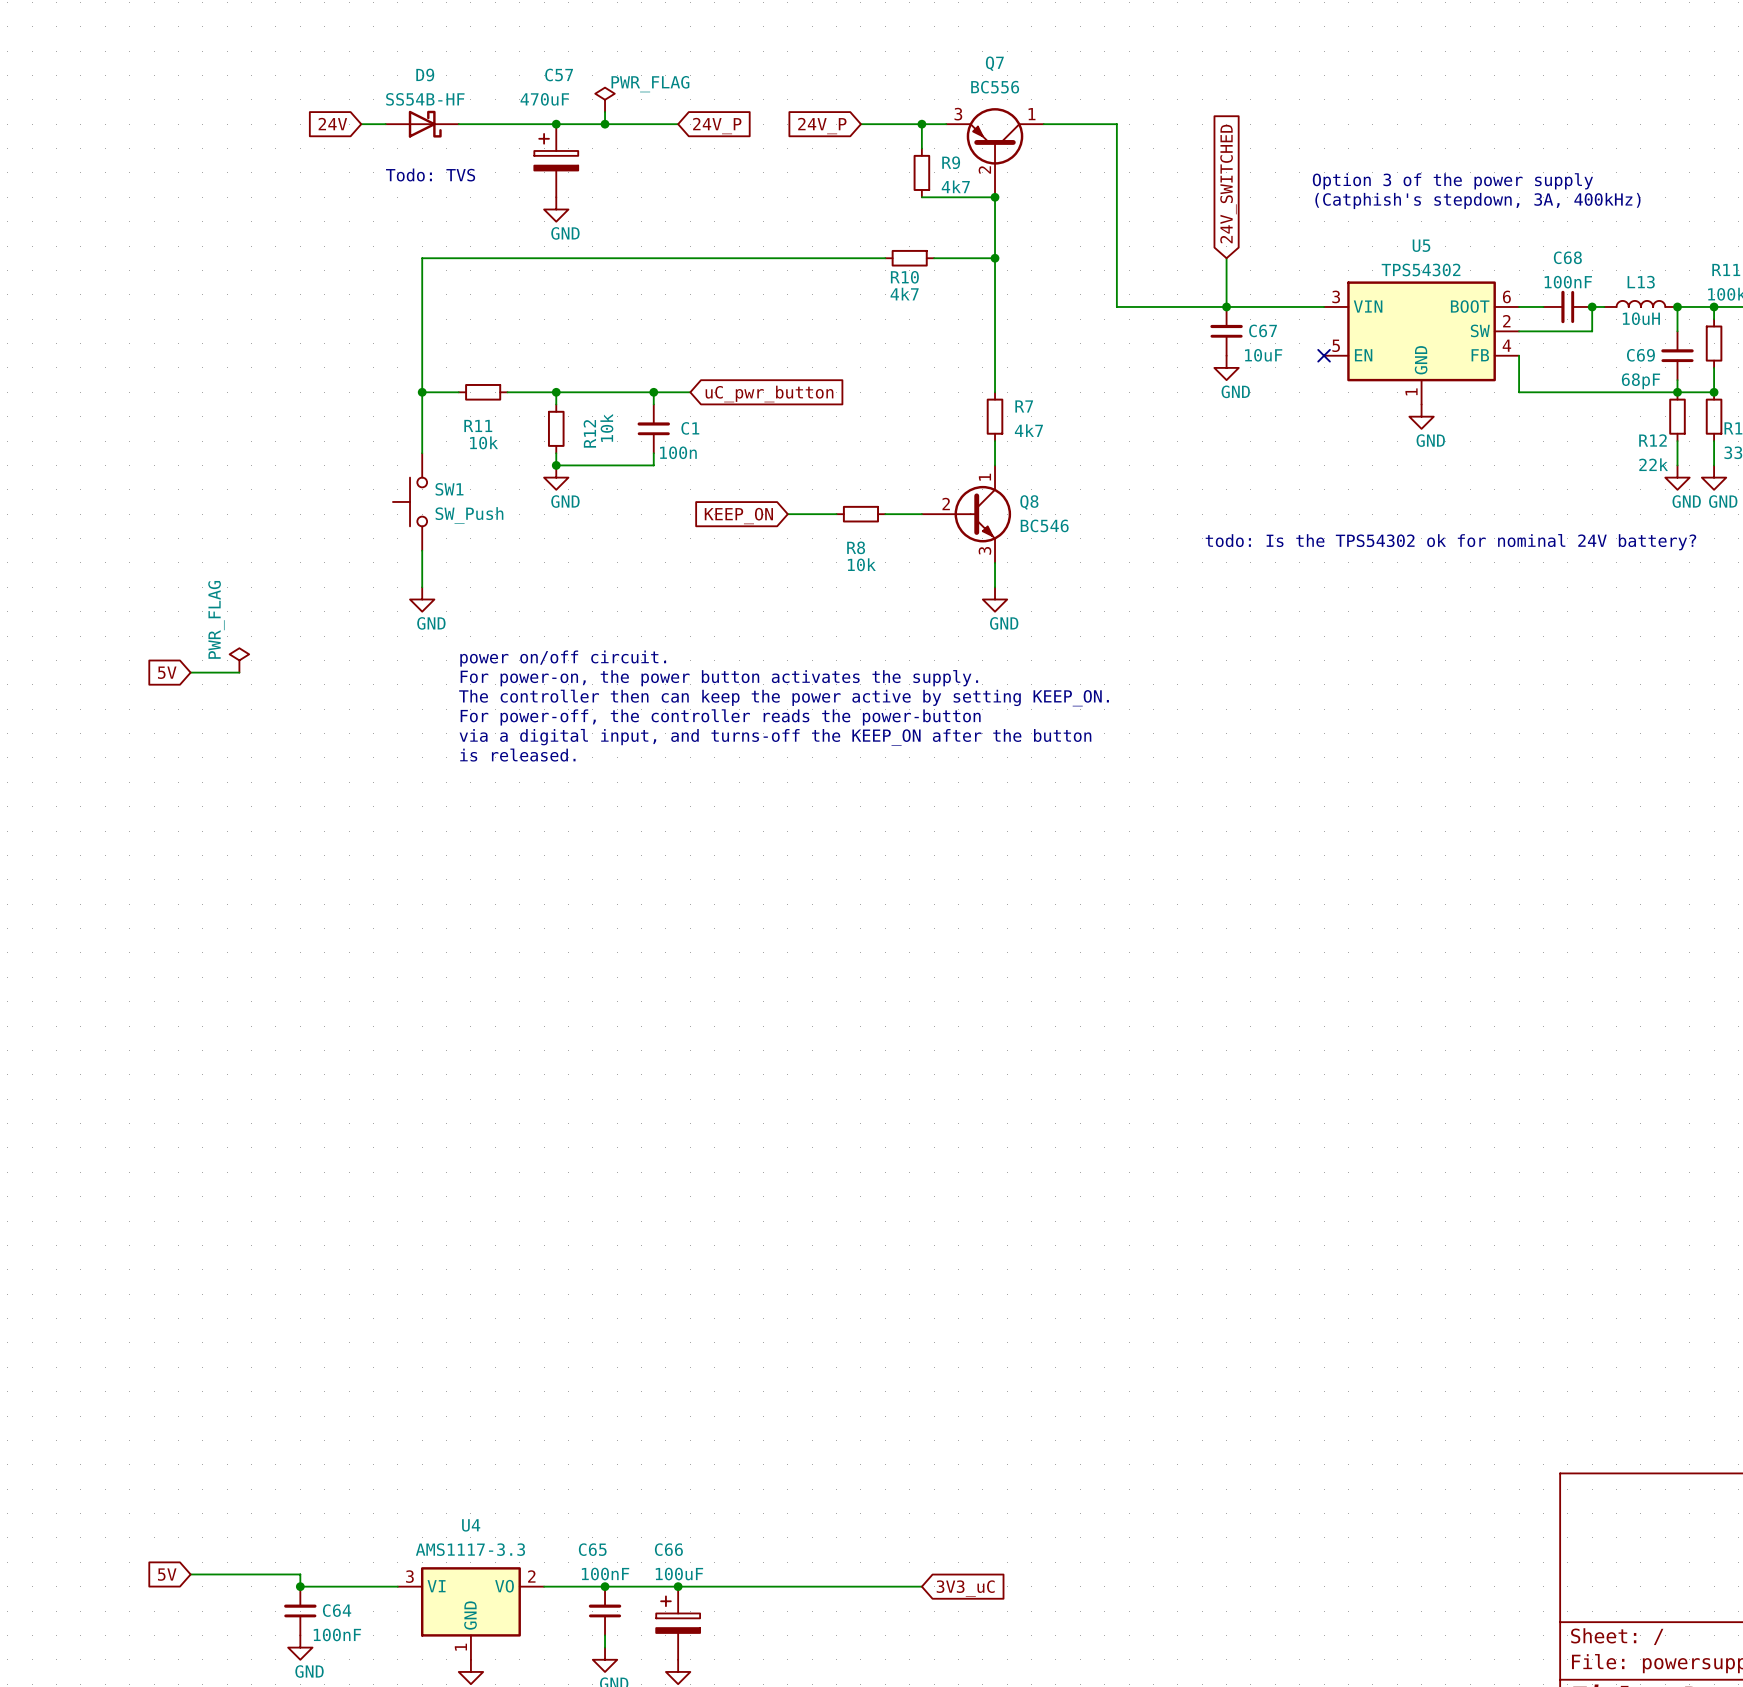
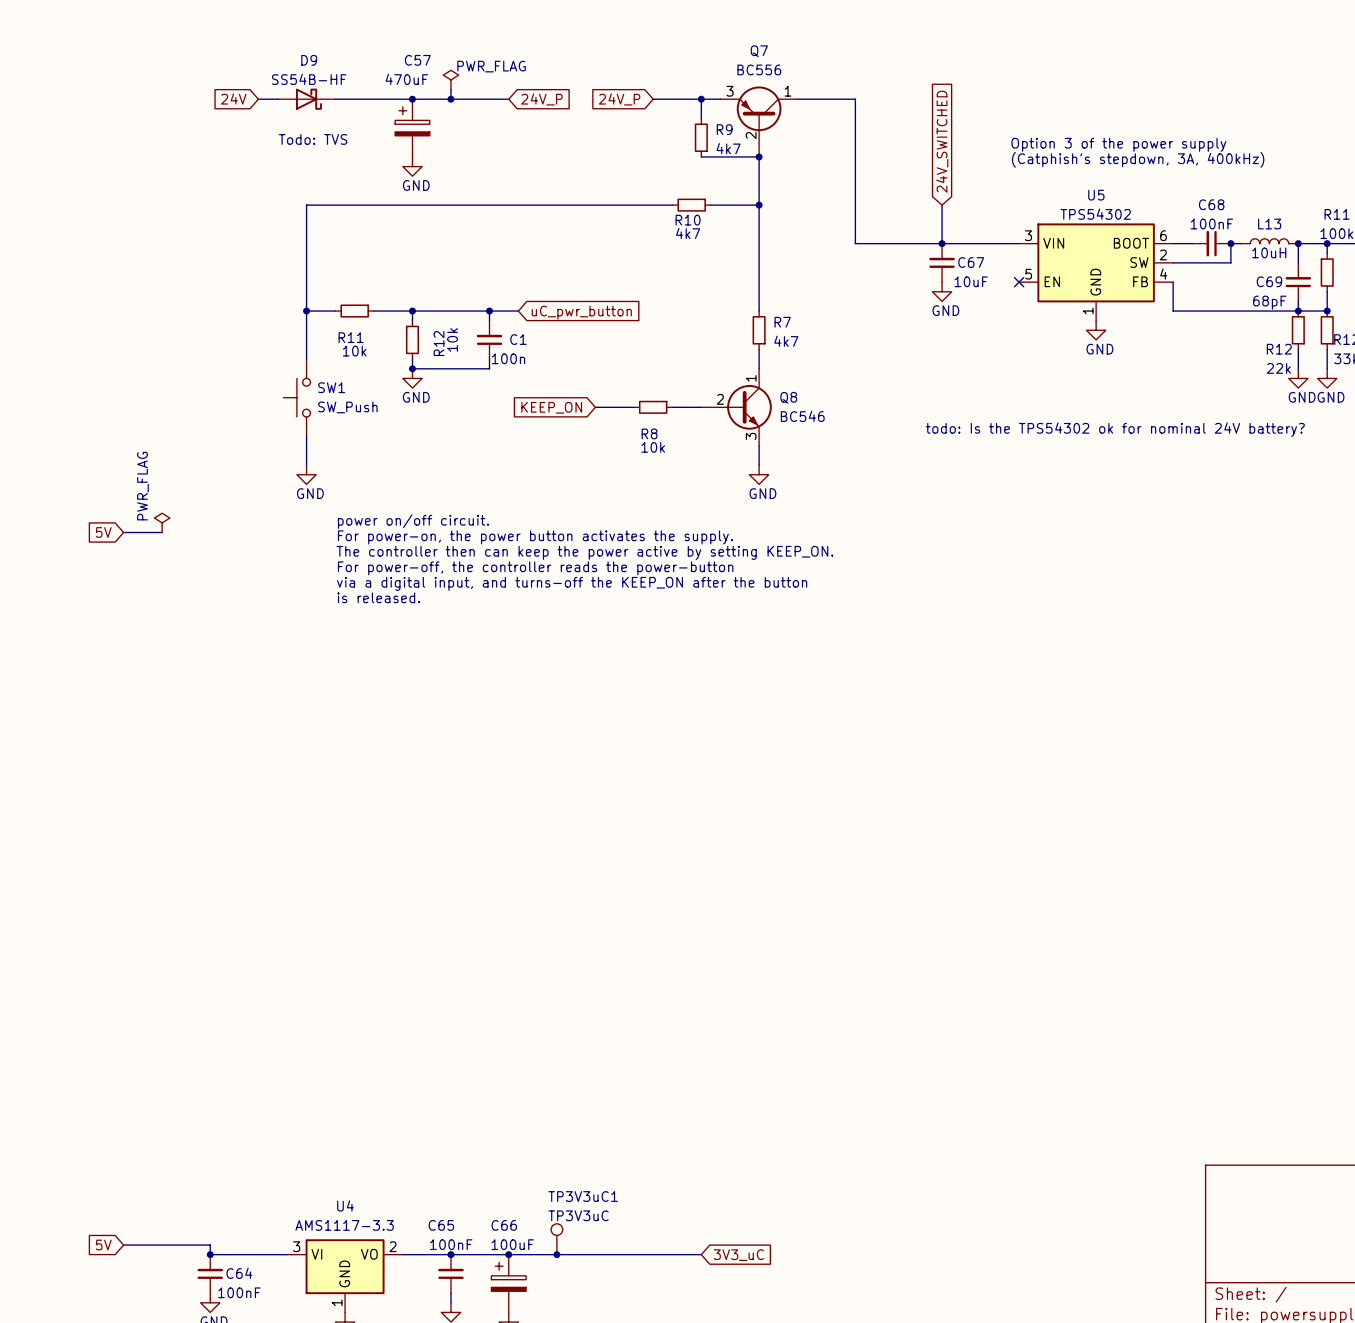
TP3V3uC1: none -> TP3V3uC (556, 1239)
junction: none -> (556, 1254)

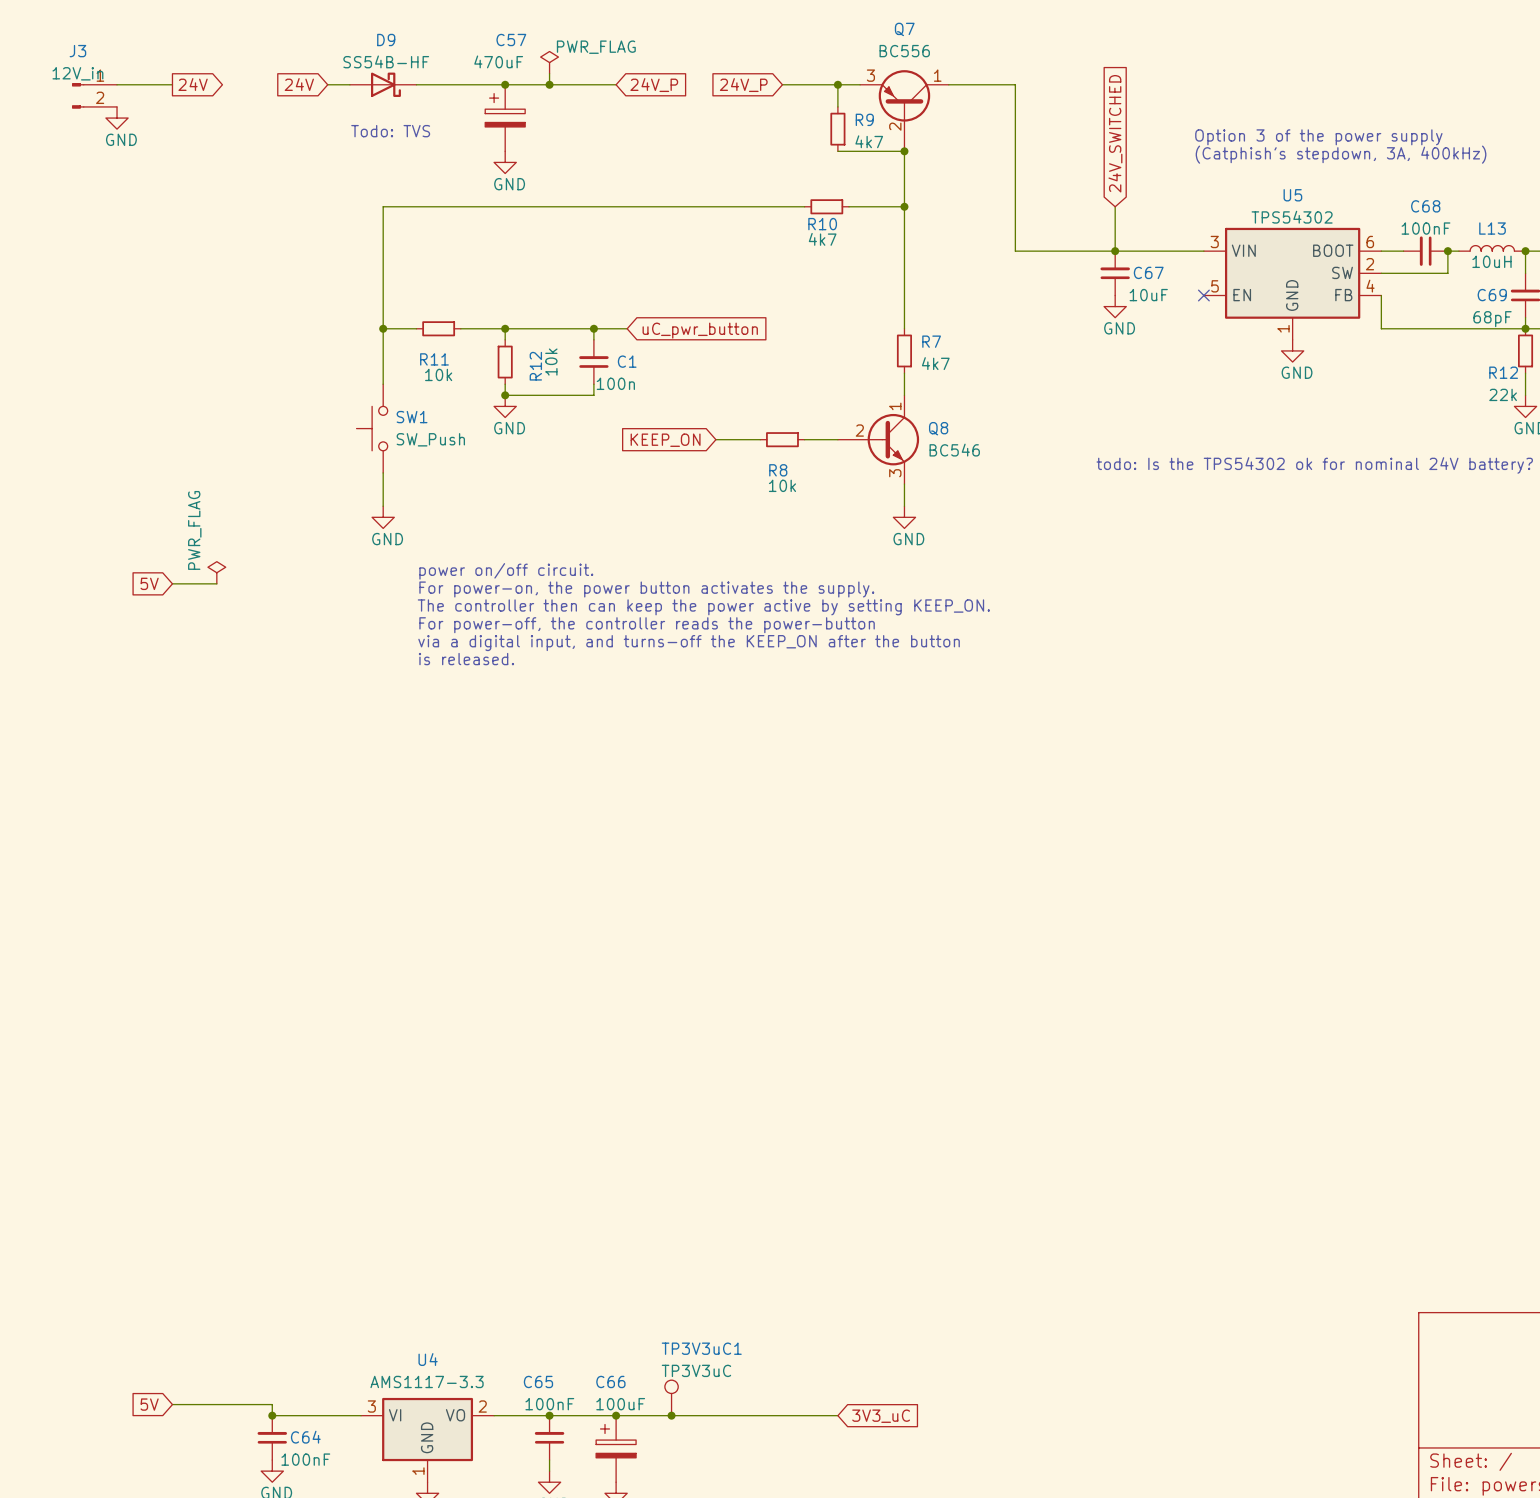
global label: none -> 24V (193, 84)
wire: none -> (117, 84) (172, 84)
J3: none -> 12V_in (94, 95)
power symbol: none -> GND (117, 118)

